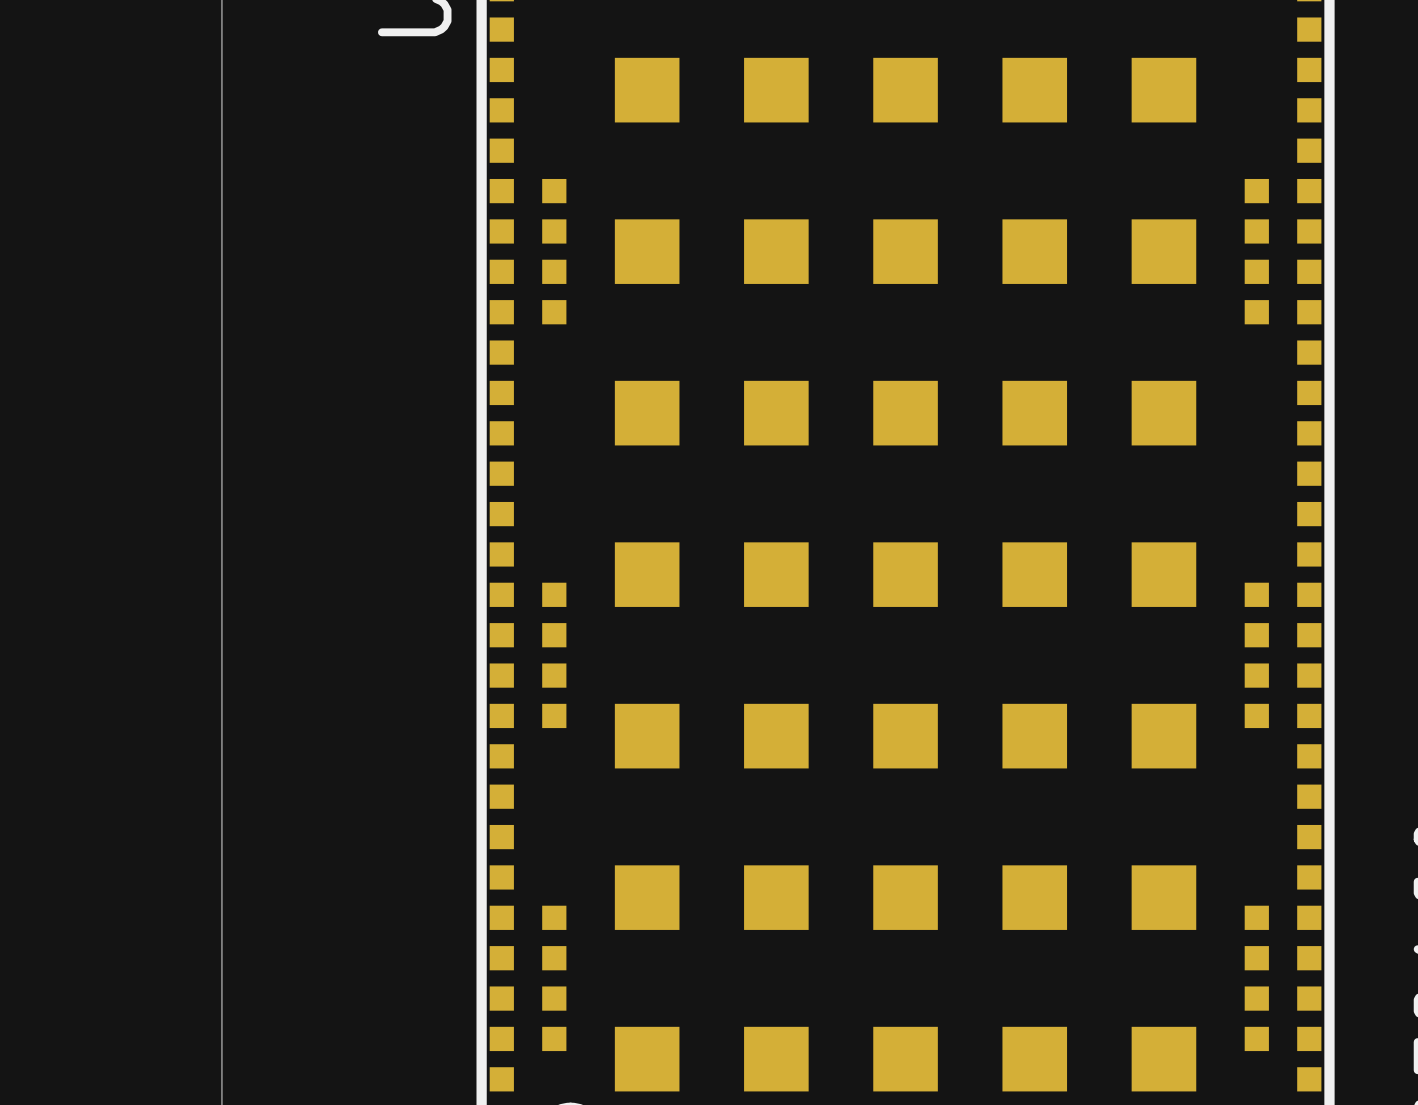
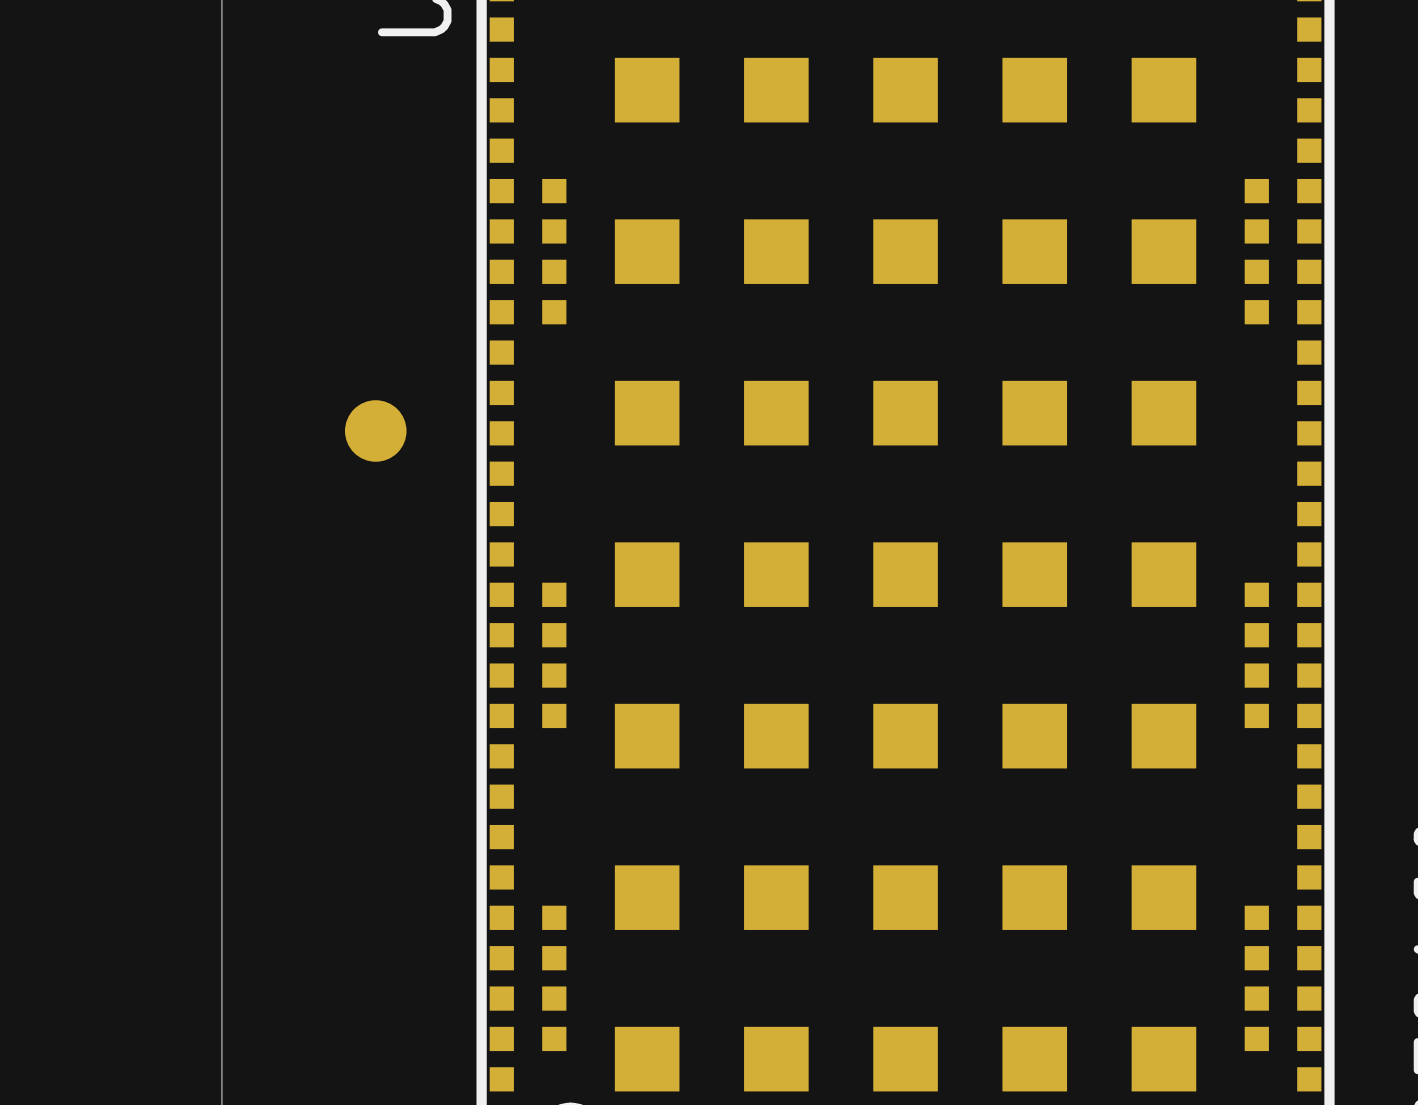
part: none -> (375, 430)

